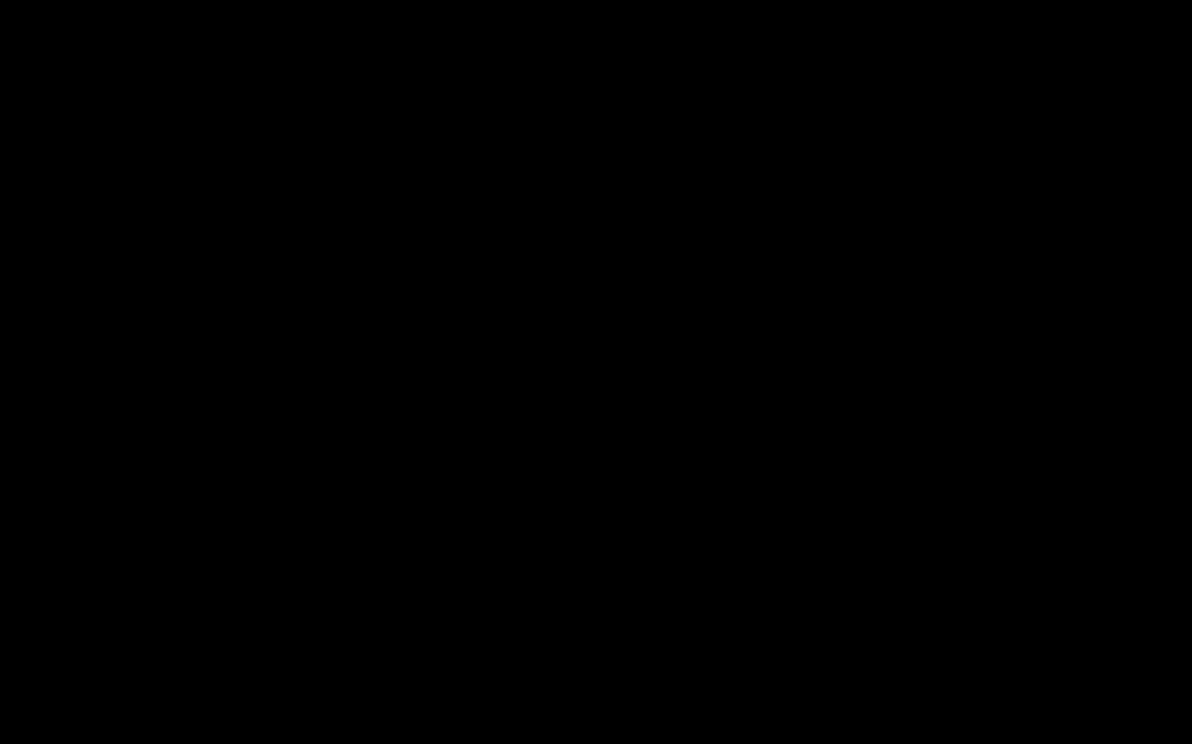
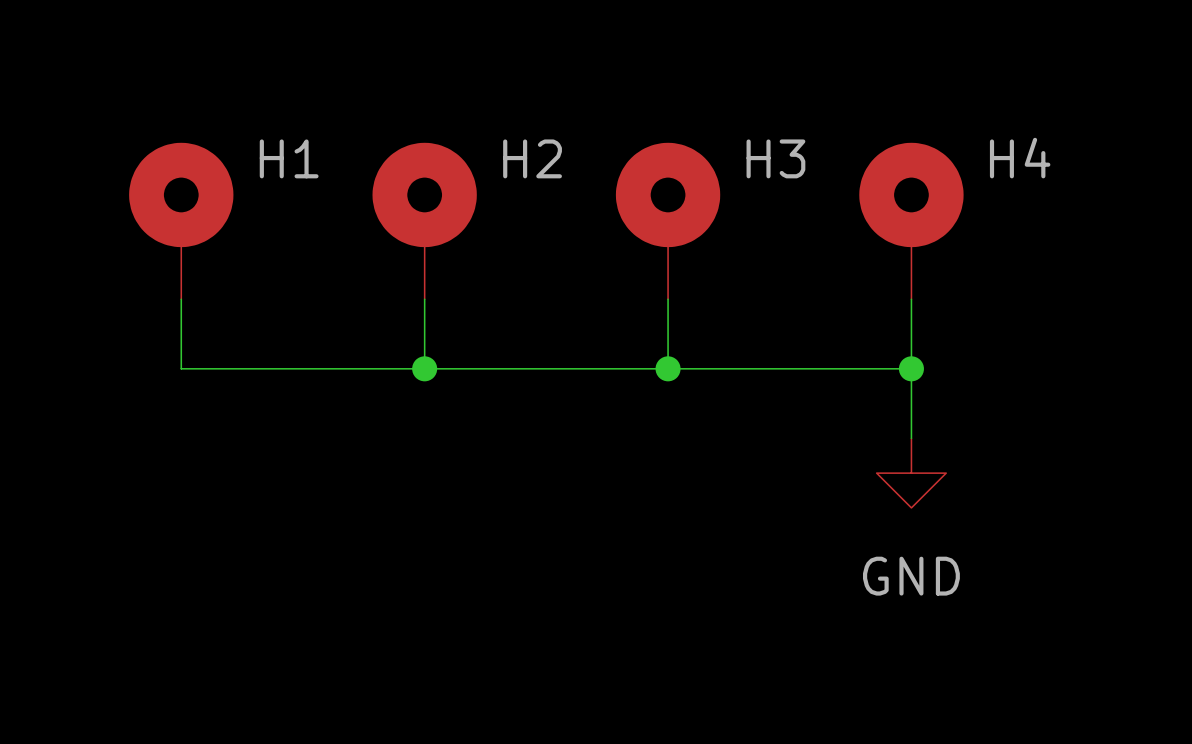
H1: none -> (181, 221)
H2: none -> (424, 221)
H3: none -> (668, 221)
H4: none -> (911, 221)
wire: none -> (181, 299) (181, 368) (911, 368)
wire: none -> (424, 299) (424, 368)
wire: none -> (668, 299) (668, 368)
wire: none -> (911, 299) (911, 438)
junction: none -> (424, 368)
junction: none -> (668, 368)
junction: none -> (911, 368)
power symbol: none -> GND (911, 473)

